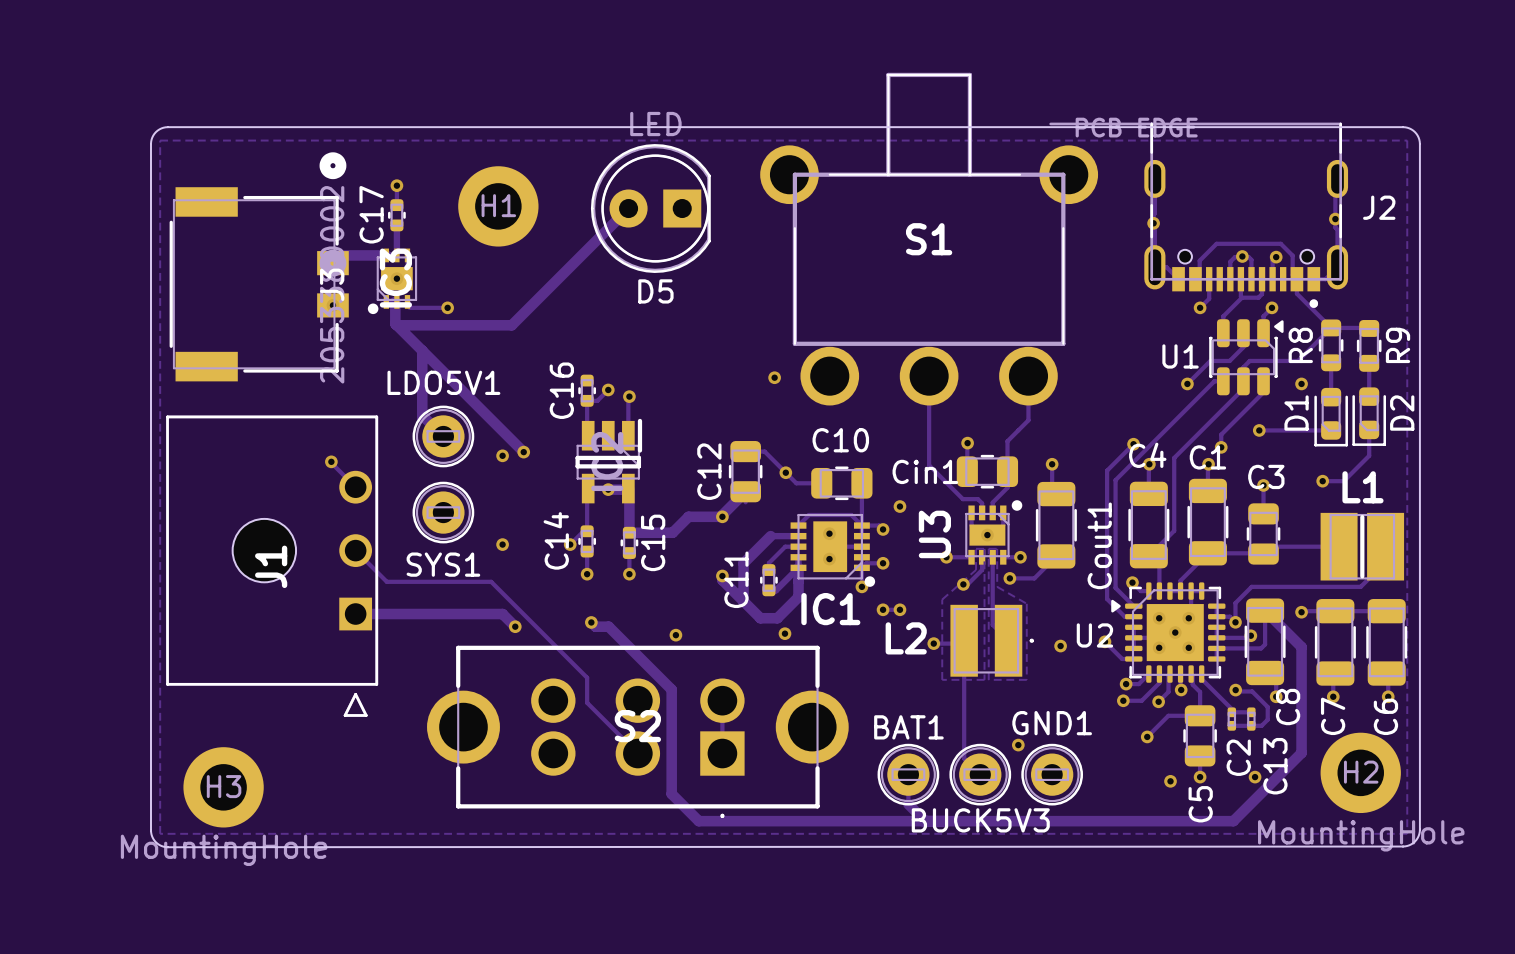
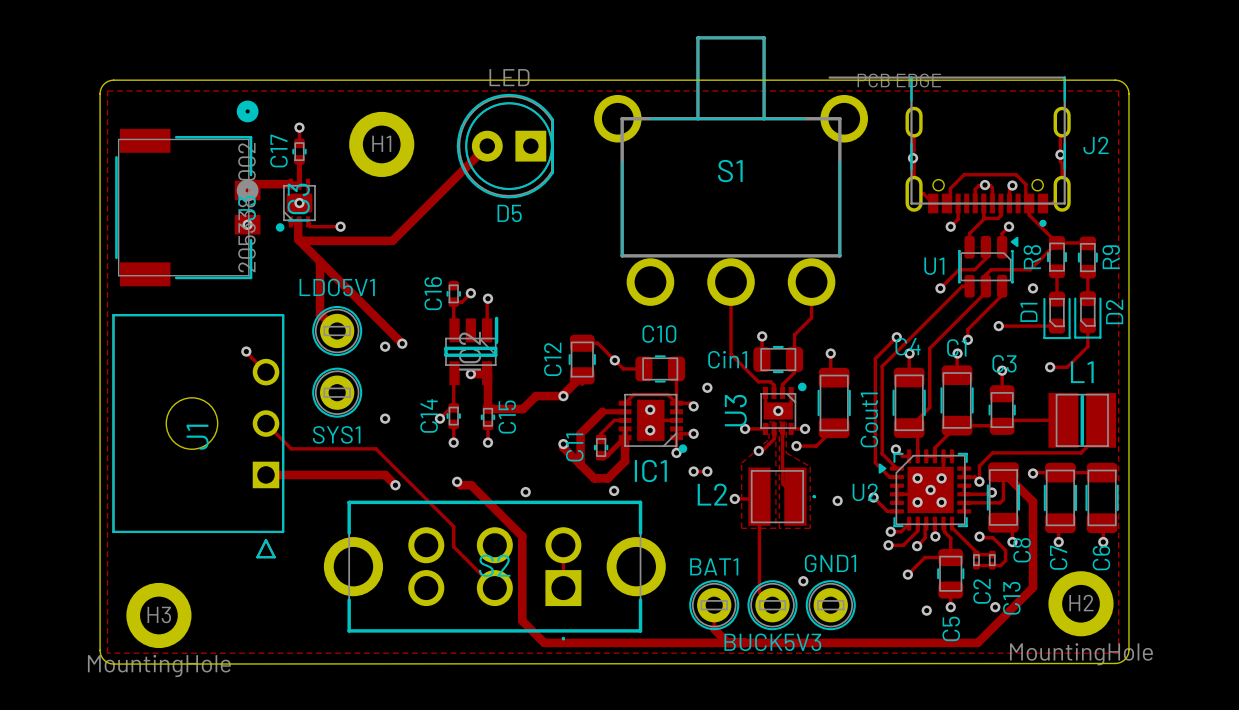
via: (774, 377) -> none

